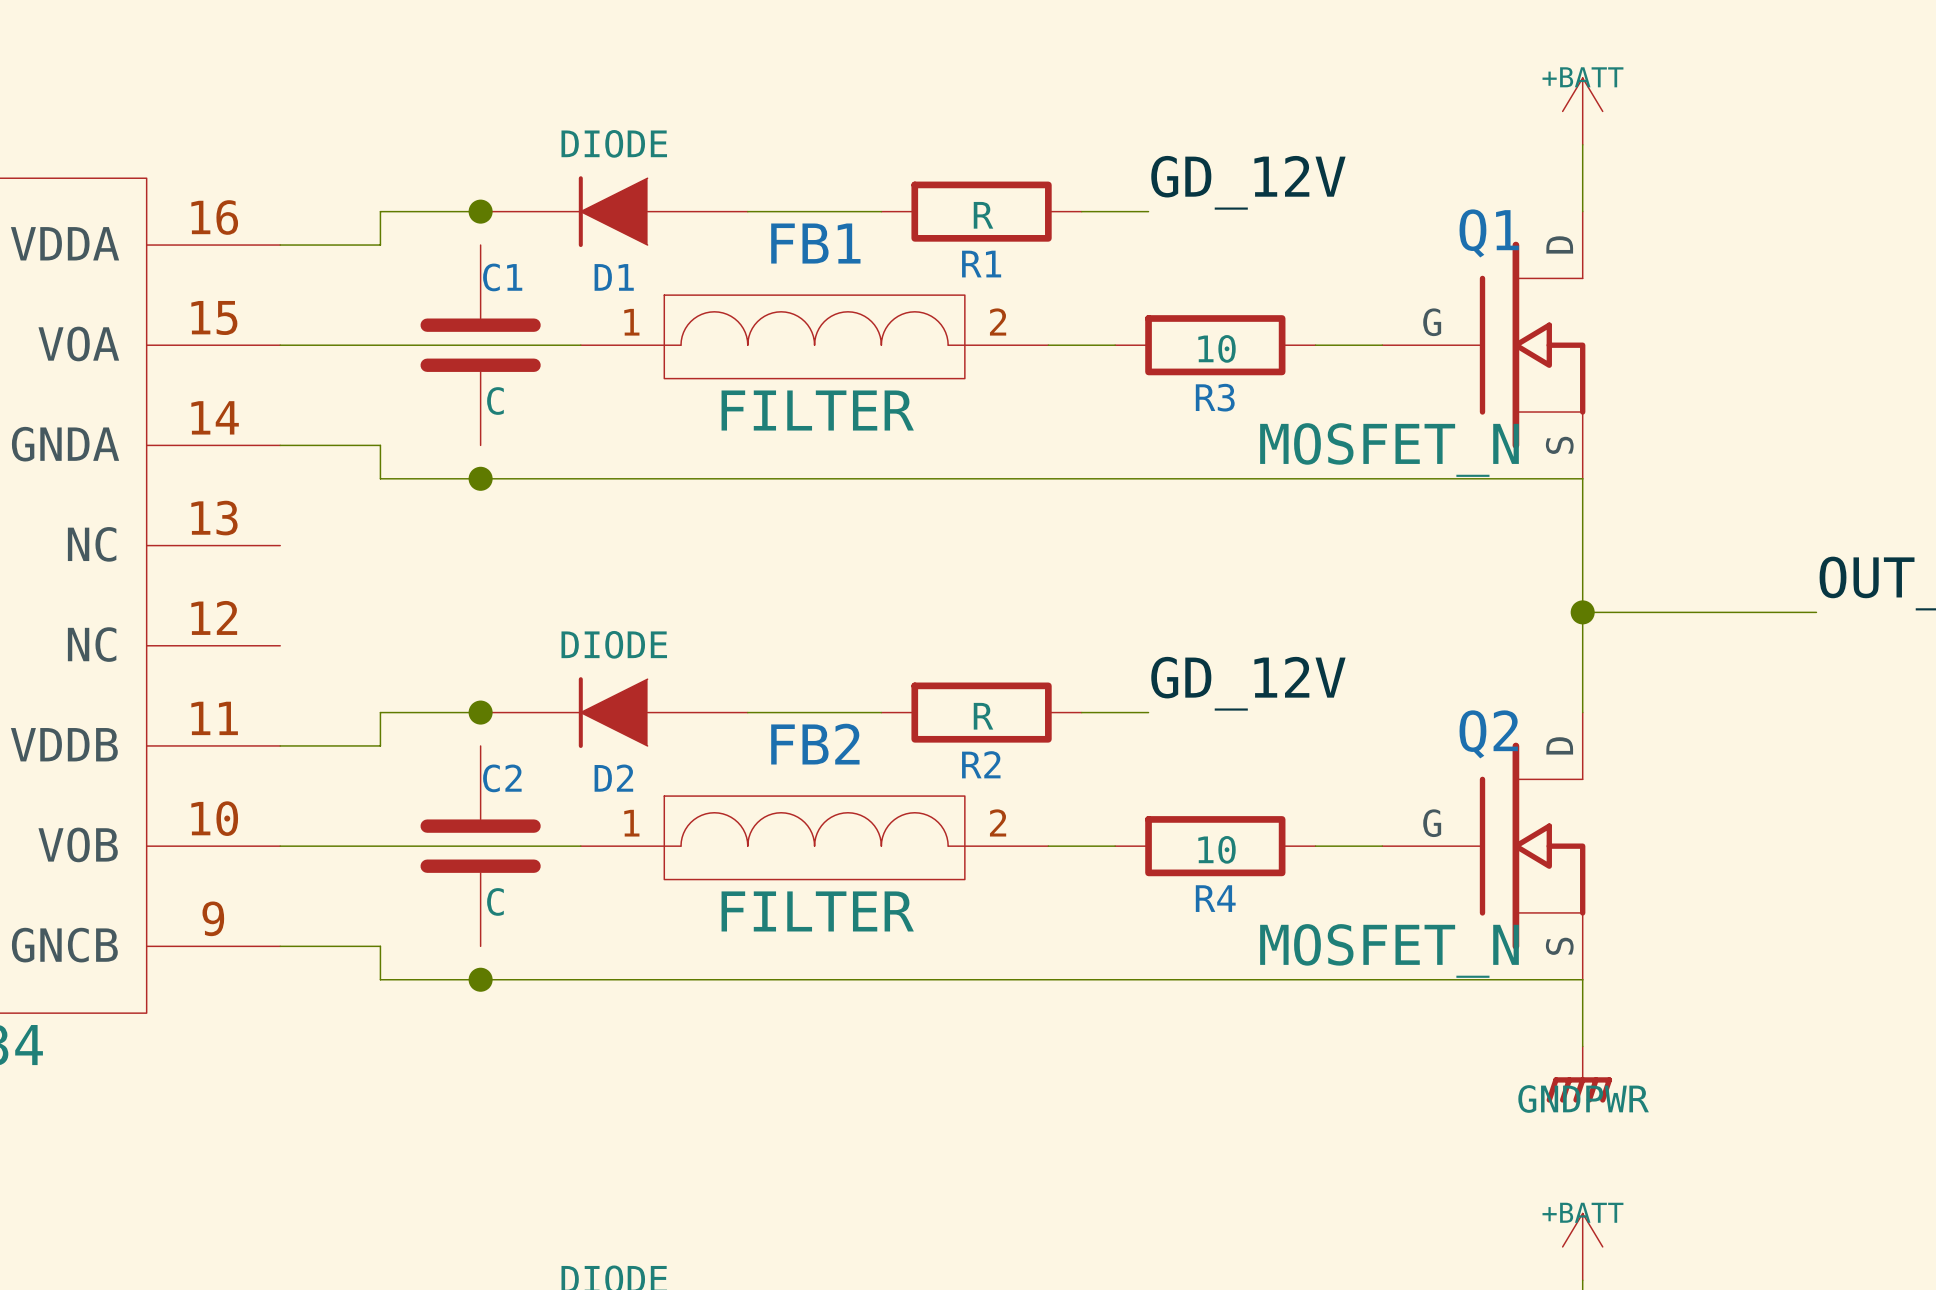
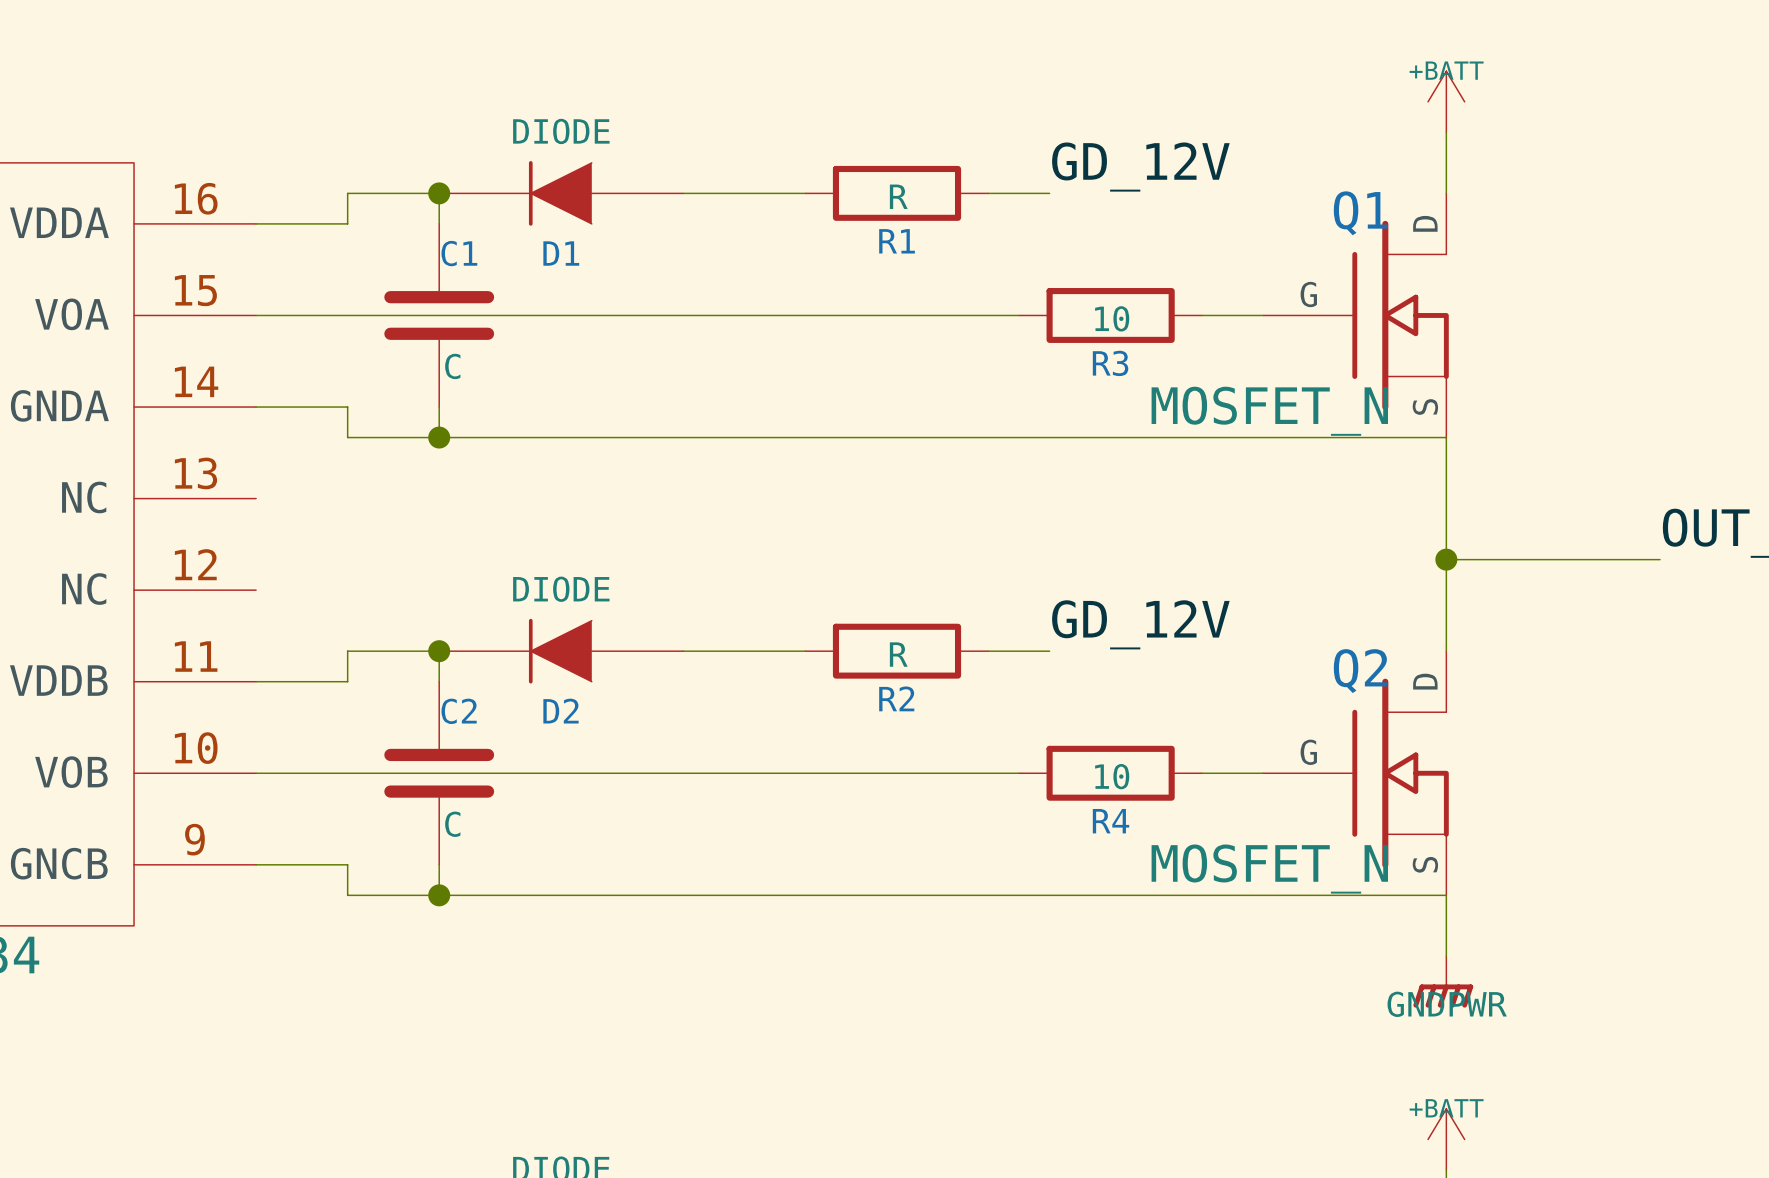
wire: none -> (439, 193) (439, 223)
FB1: FILTER (814, 336) -> none
wire: none -> (530, 315) (958, 315)
wire: none -> (439, 407) (439, 437)
wire: none -> (439, 651) (439, 681)
FB2: FILTER (814, 837) -> none
wire: none -> (530, 773) (958, 773)
wire: none -> (439, 864) (439, 895)

